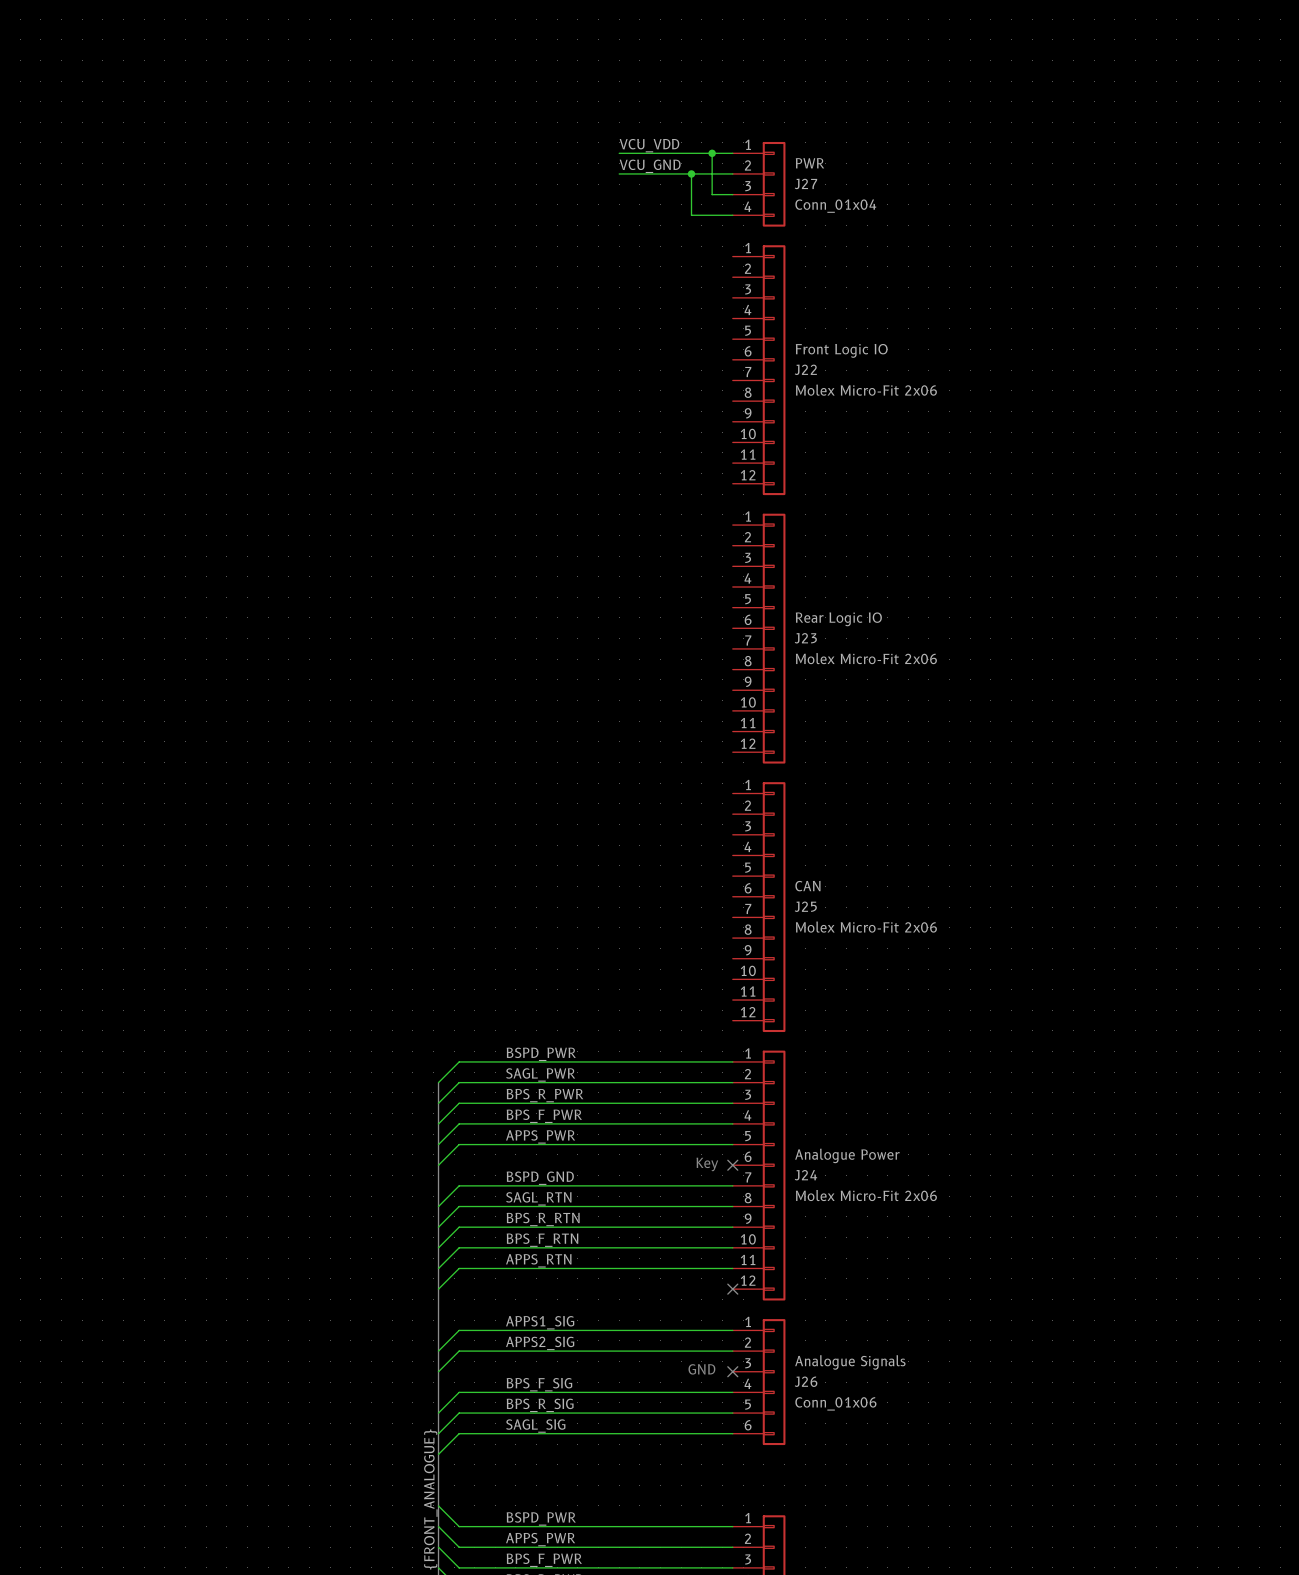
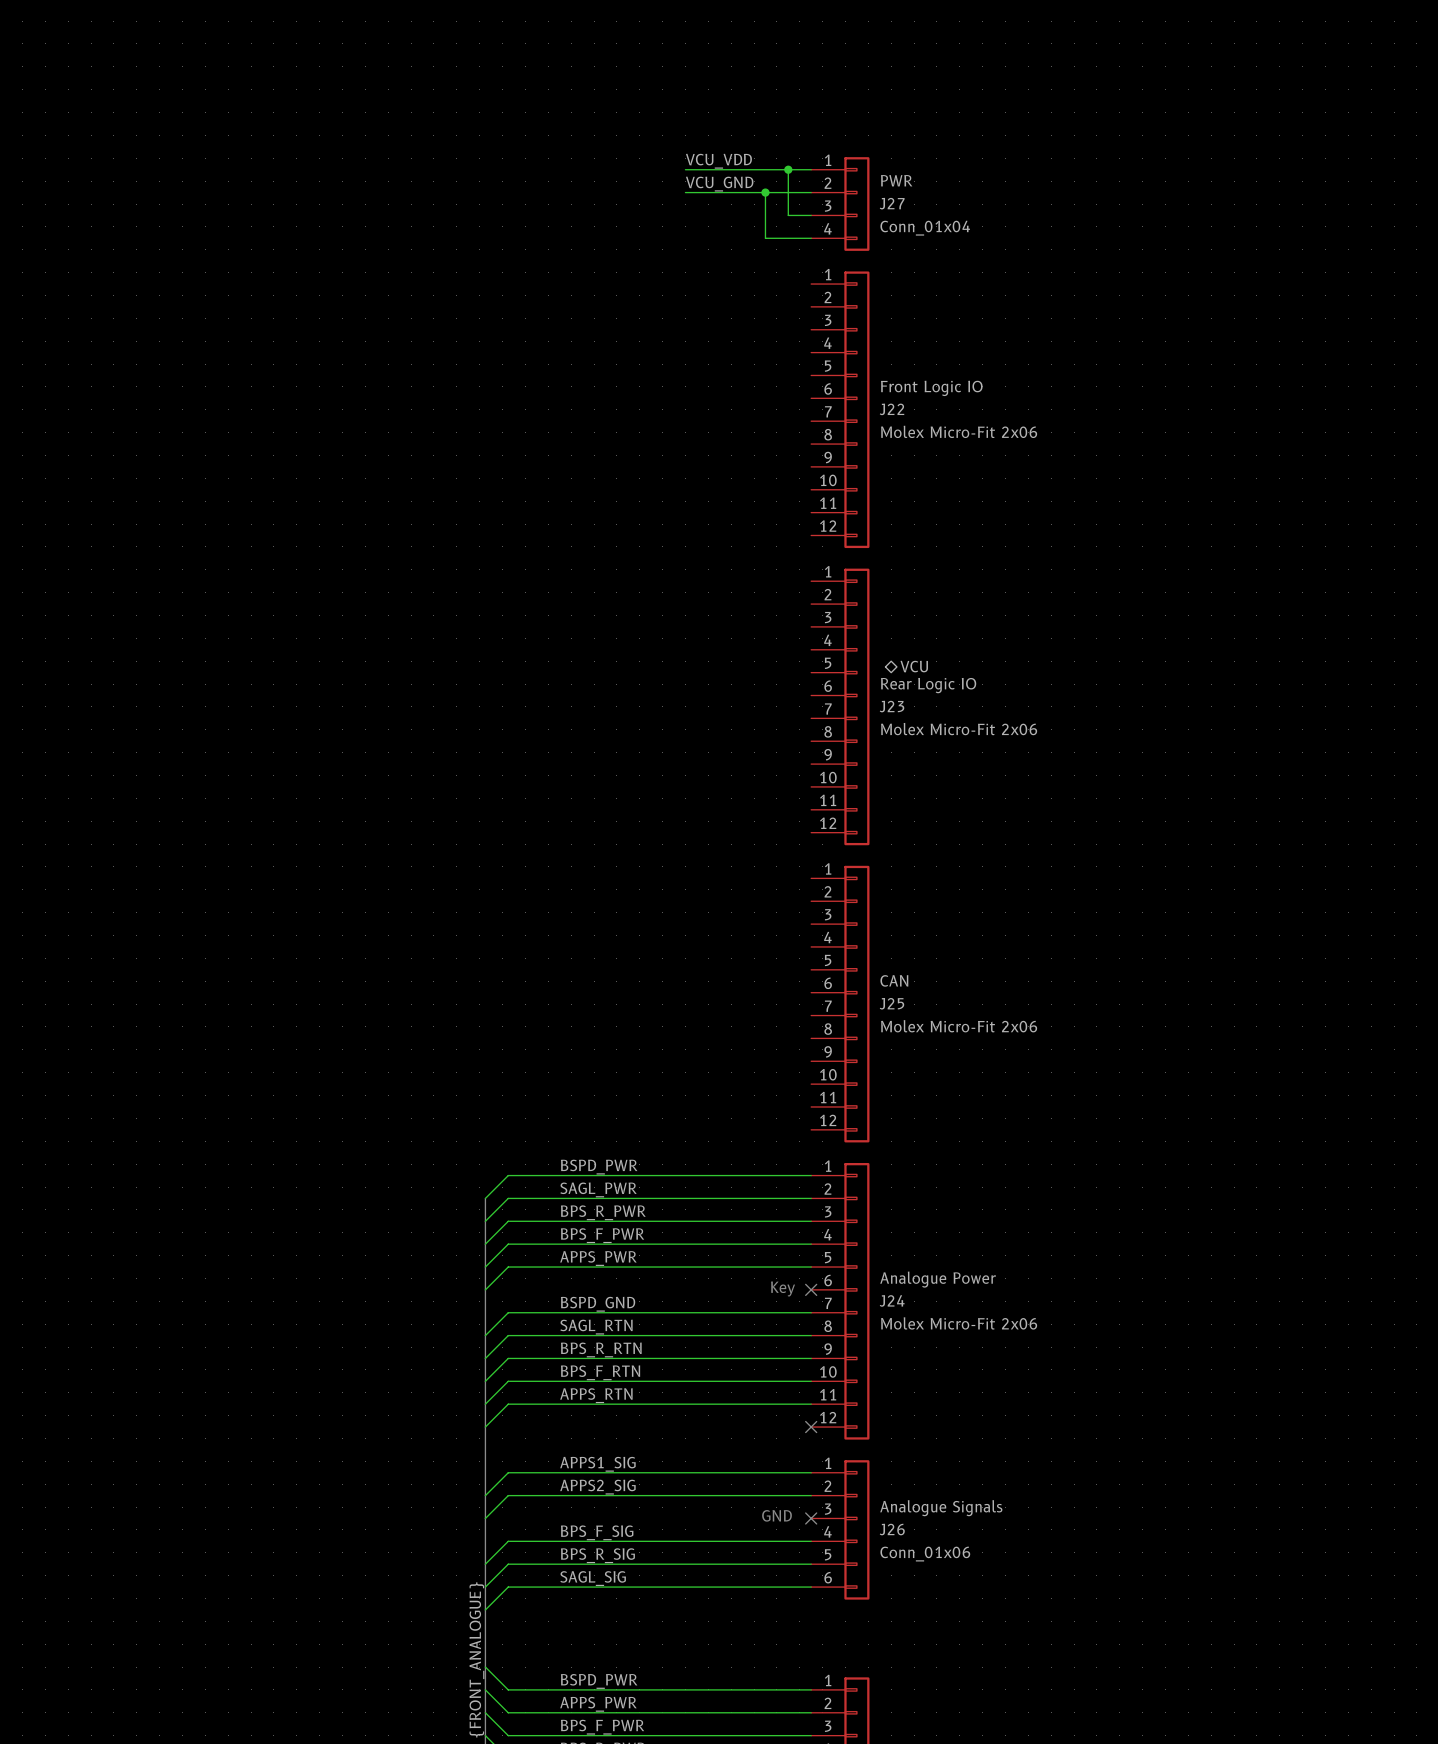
hierarchical label: none -> VCU (914, 666)

